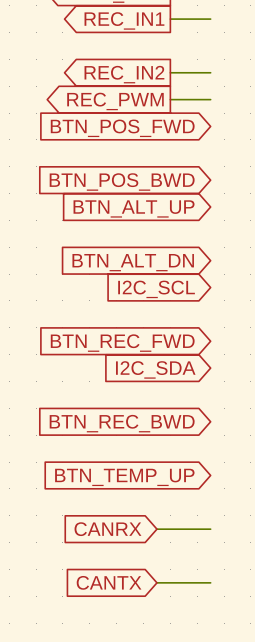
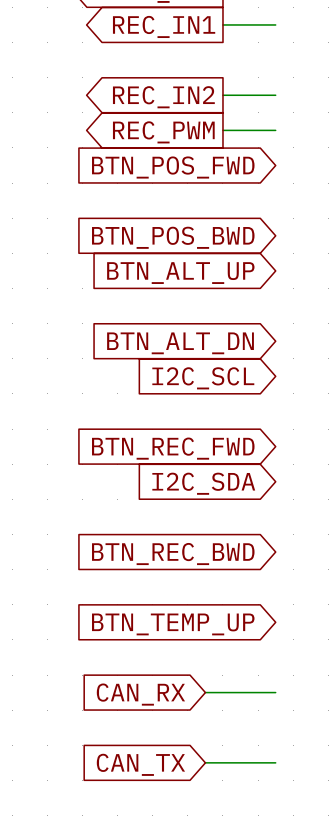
global label: CANRX (107, 529) -> CAN_RX (140, 694)
global label: CANTX (109, 582) -> CAN_TX (140, 764)

